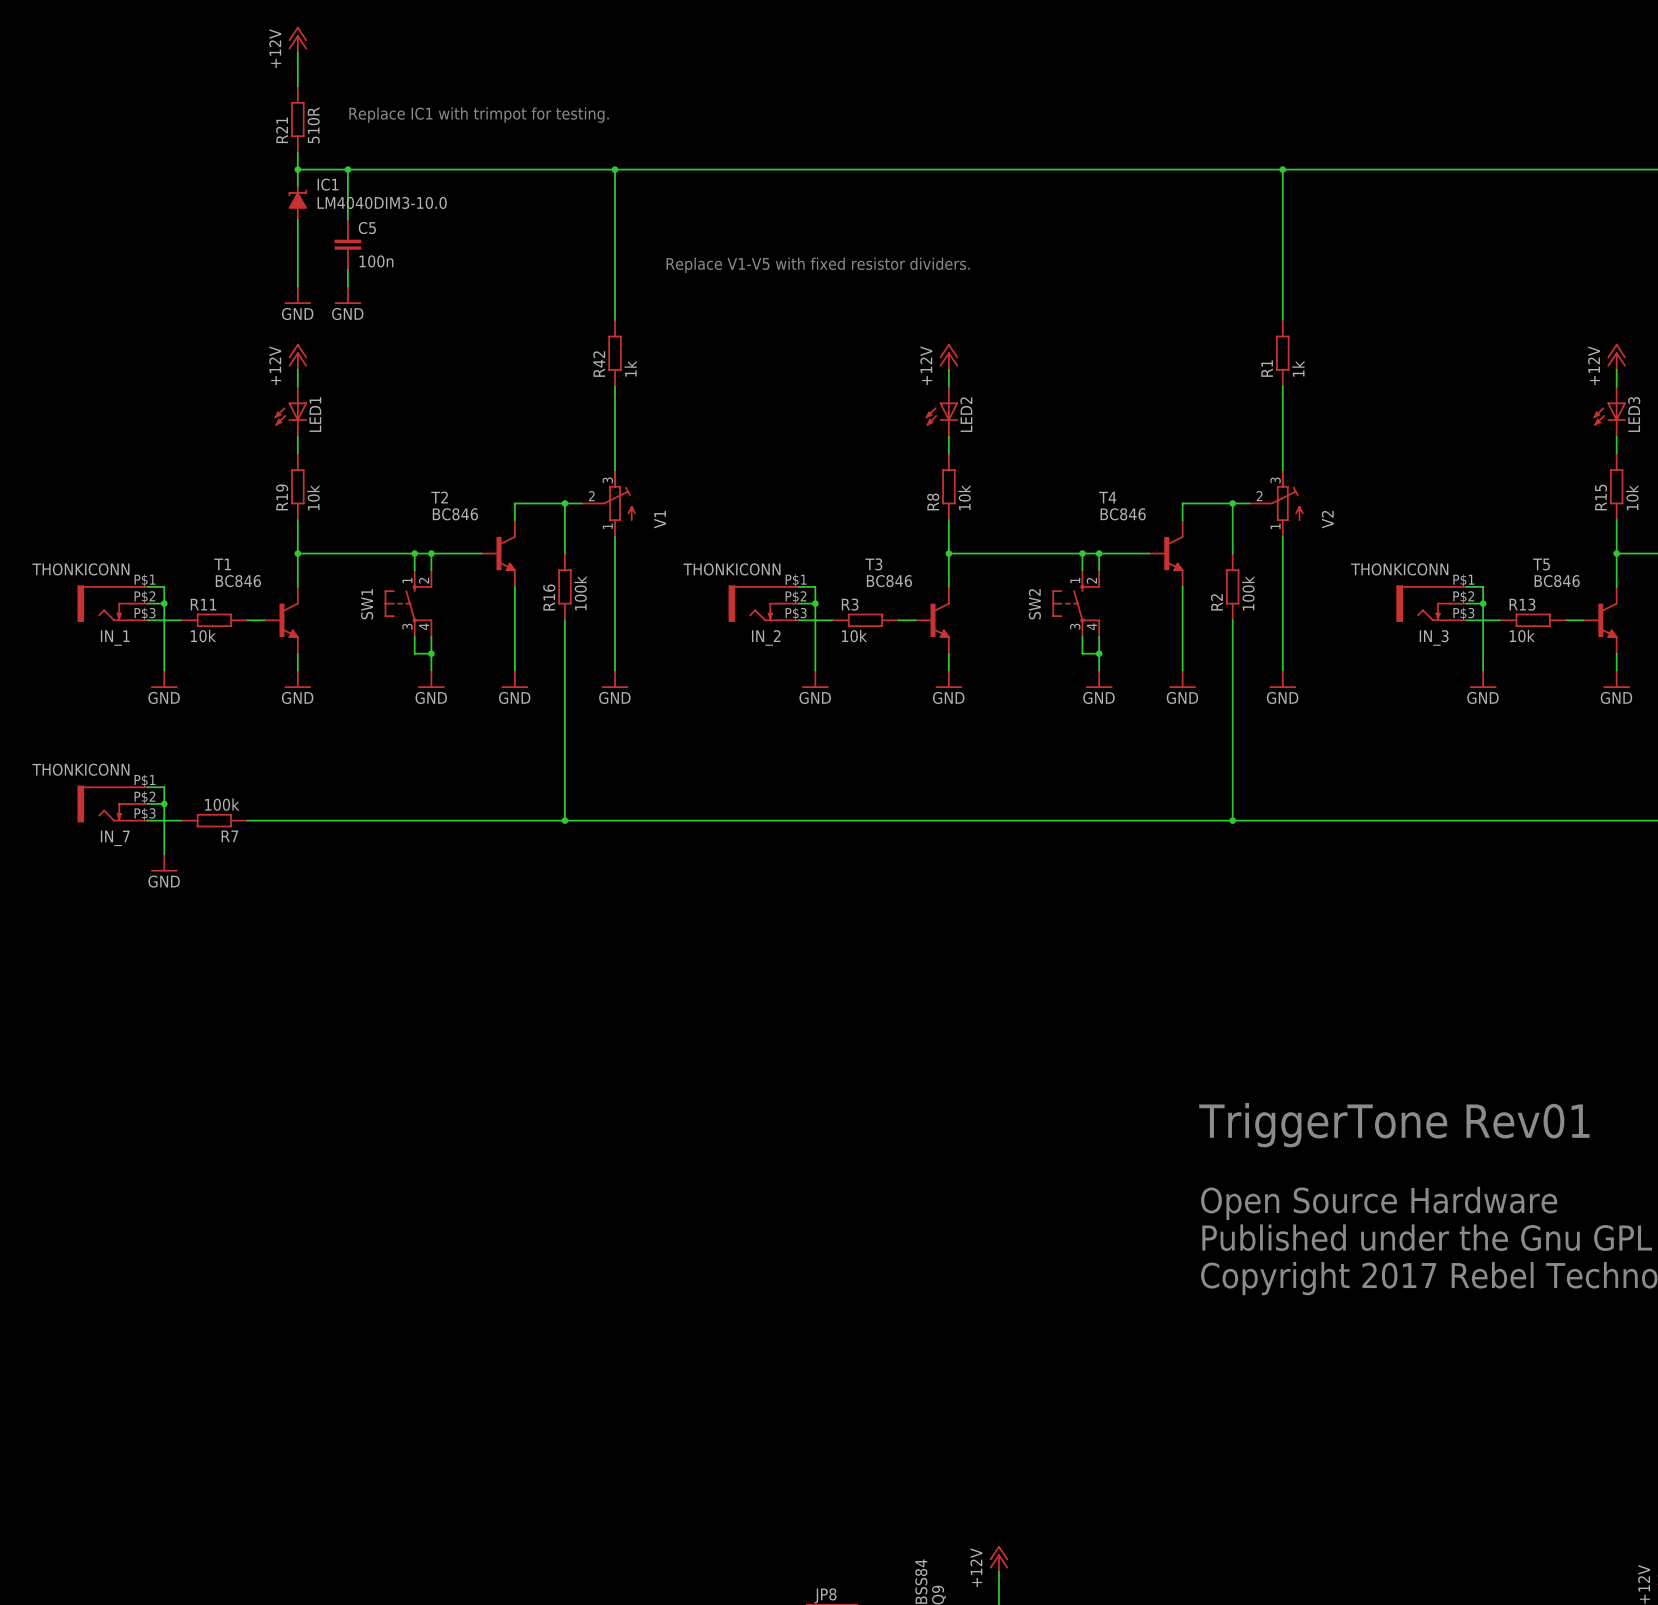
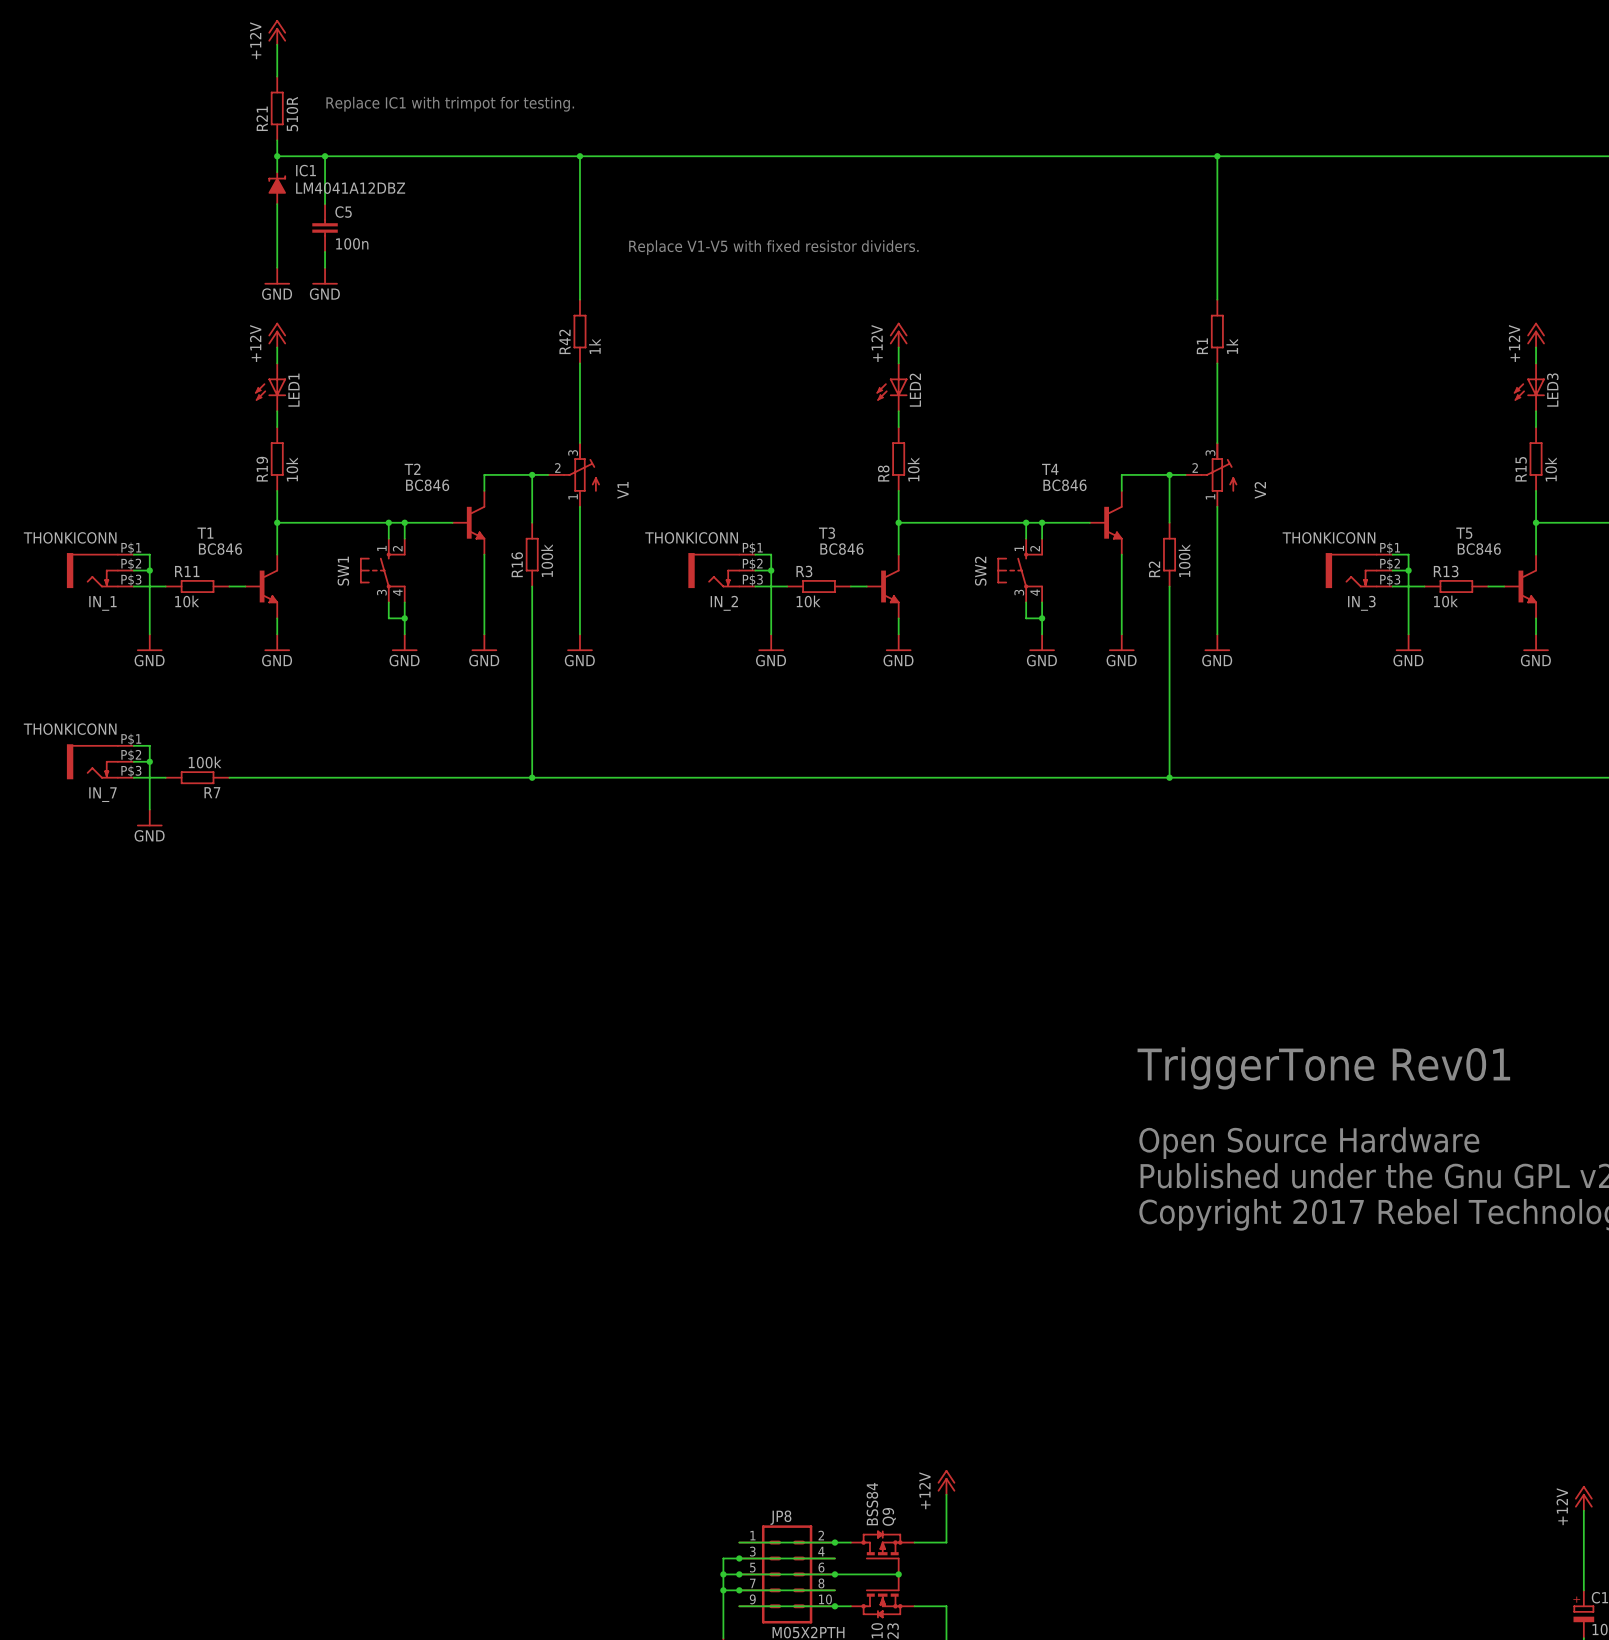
IC1 value: LM4040DIM3-10.0 (382, 202) -> LM4041A12DBZ (350, 188)

